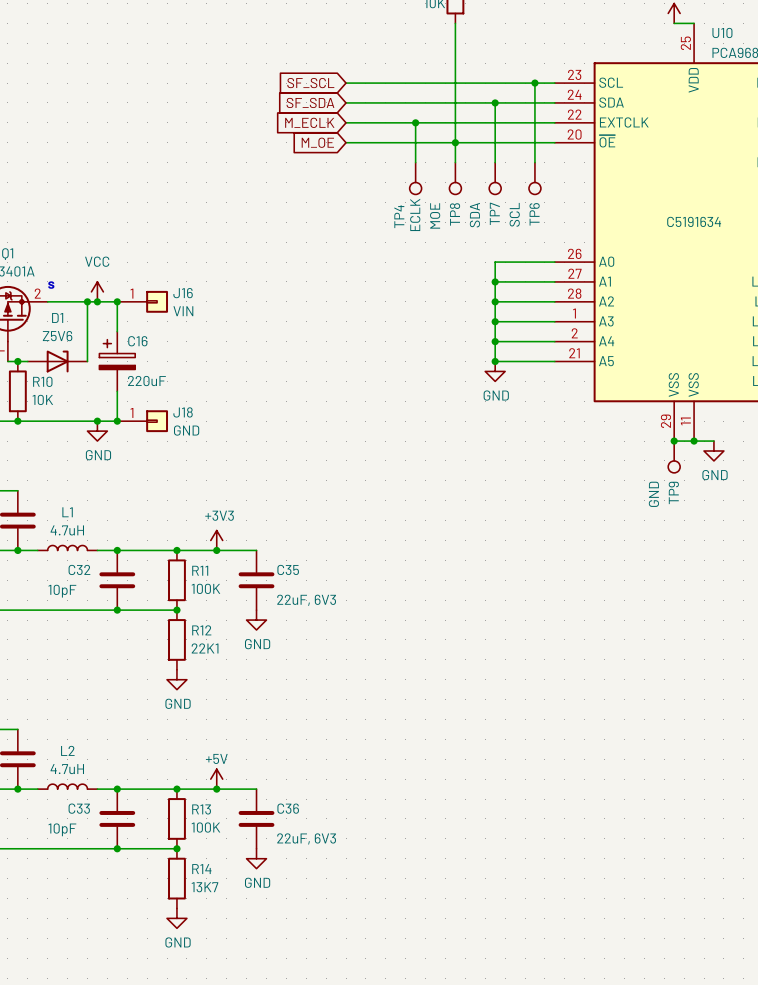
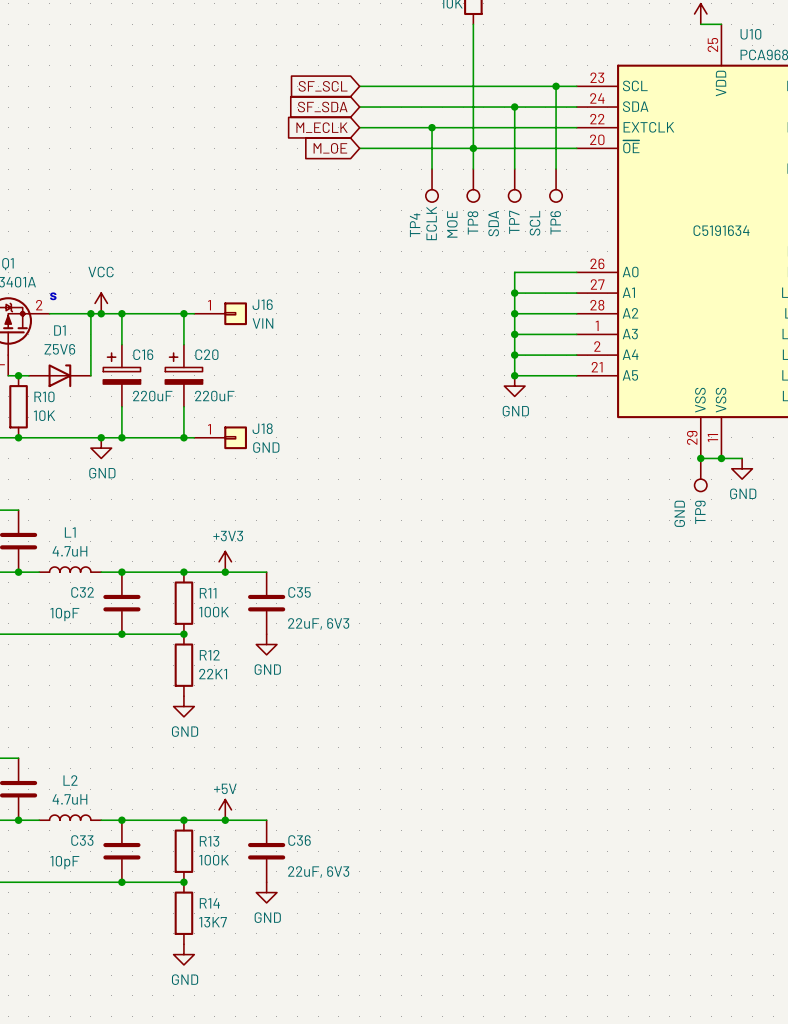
J16 position: (142, 301) -> (220, 313)
wire: none -> (183, 313) (183, 344)
junction: none -> (183, 313)
C20: none -> 220uF (183, 375)
wire: none -> (183, 406) (183, 437)
J18 position: (142, 421) -> (220, 437)
junction: none -> (183, 437)

